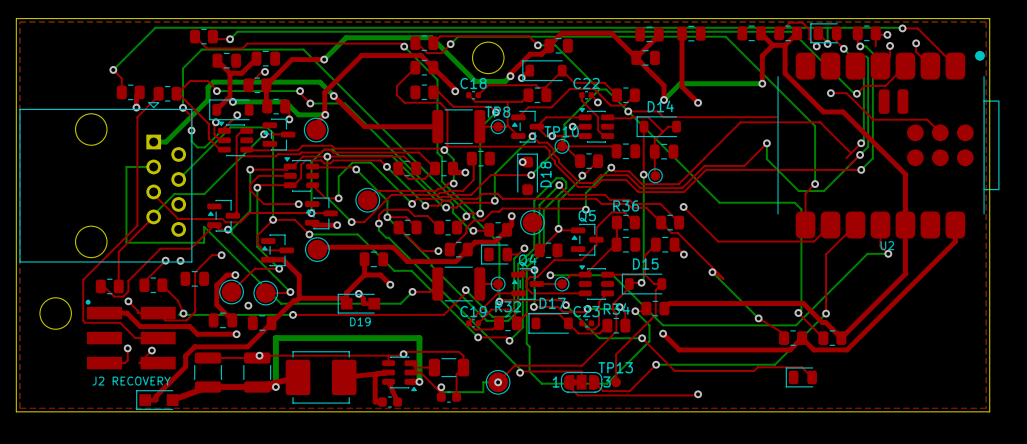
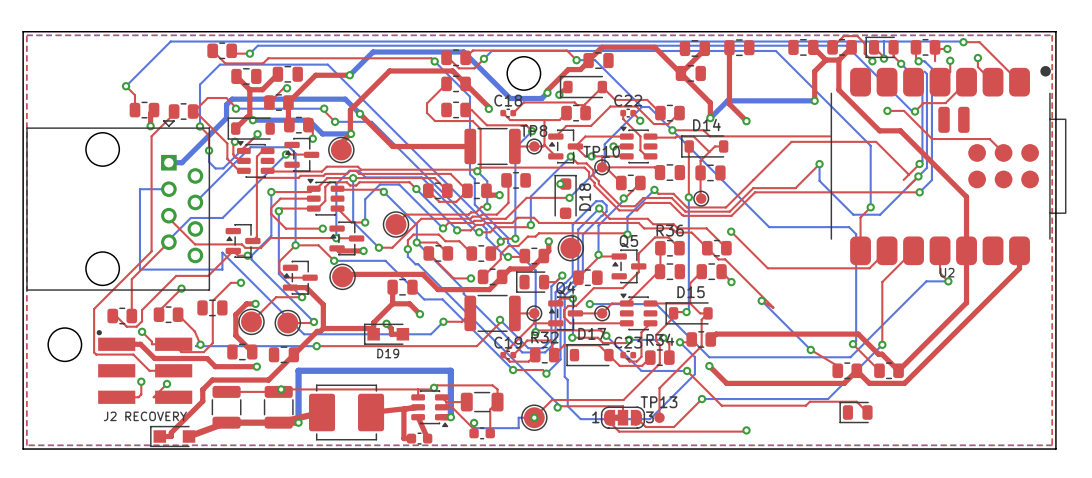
via: (180, 260) -> none
via: (248, 305) -> none

